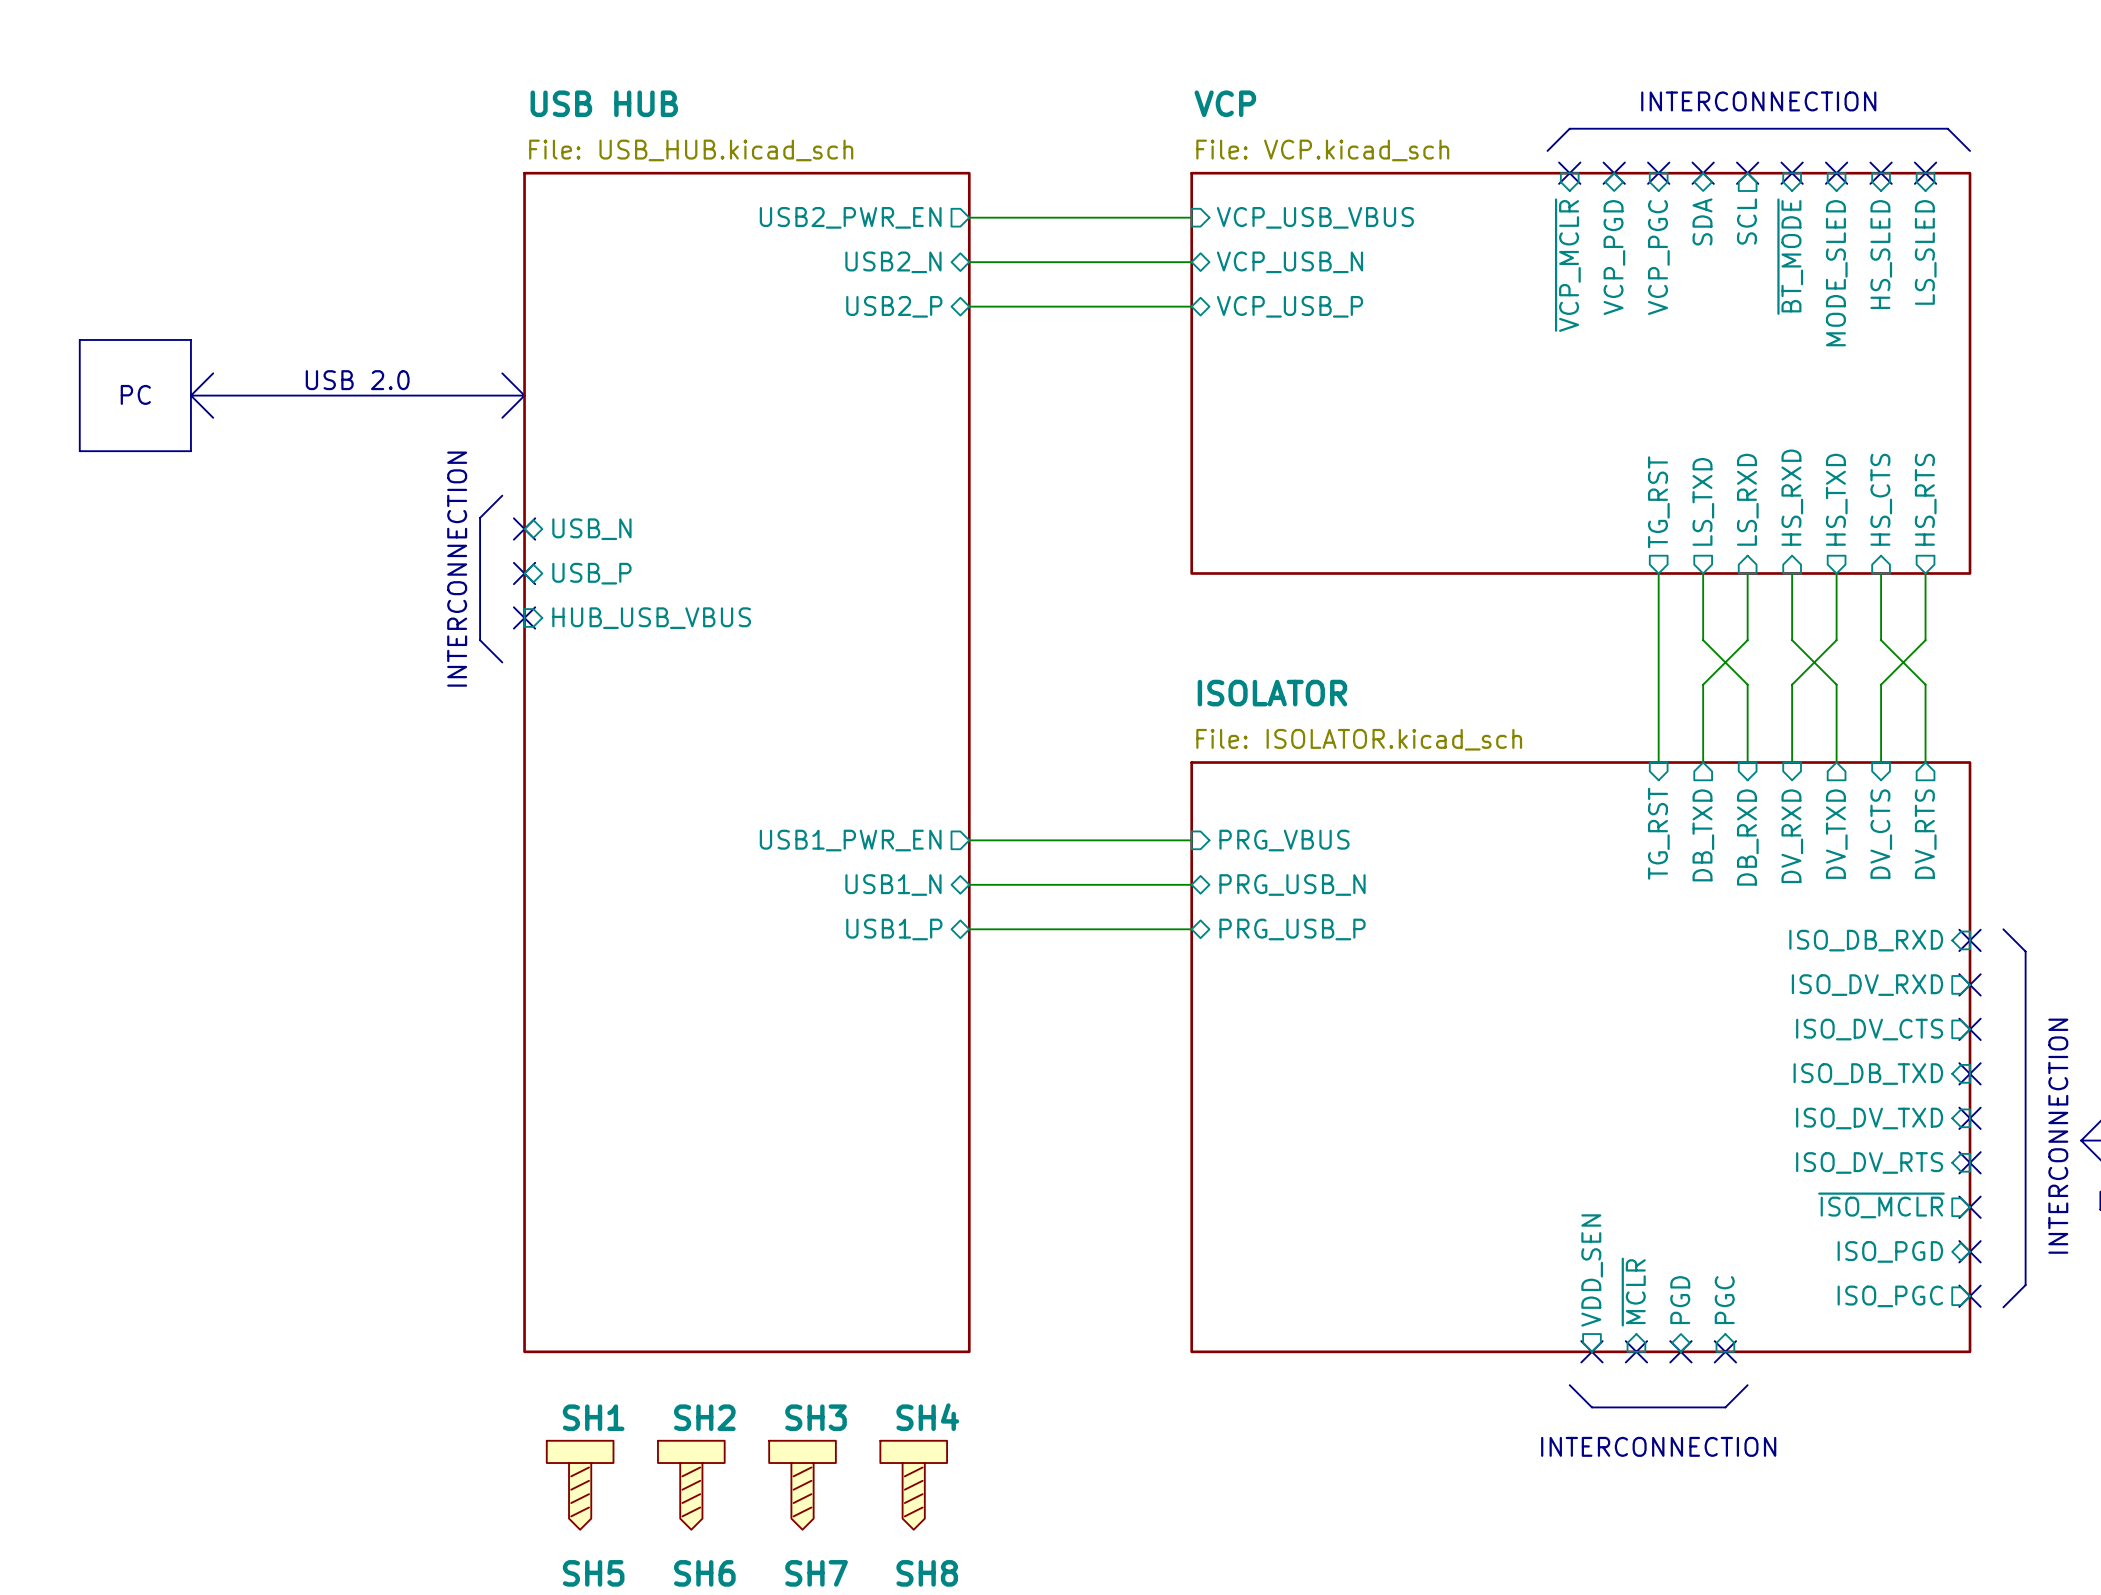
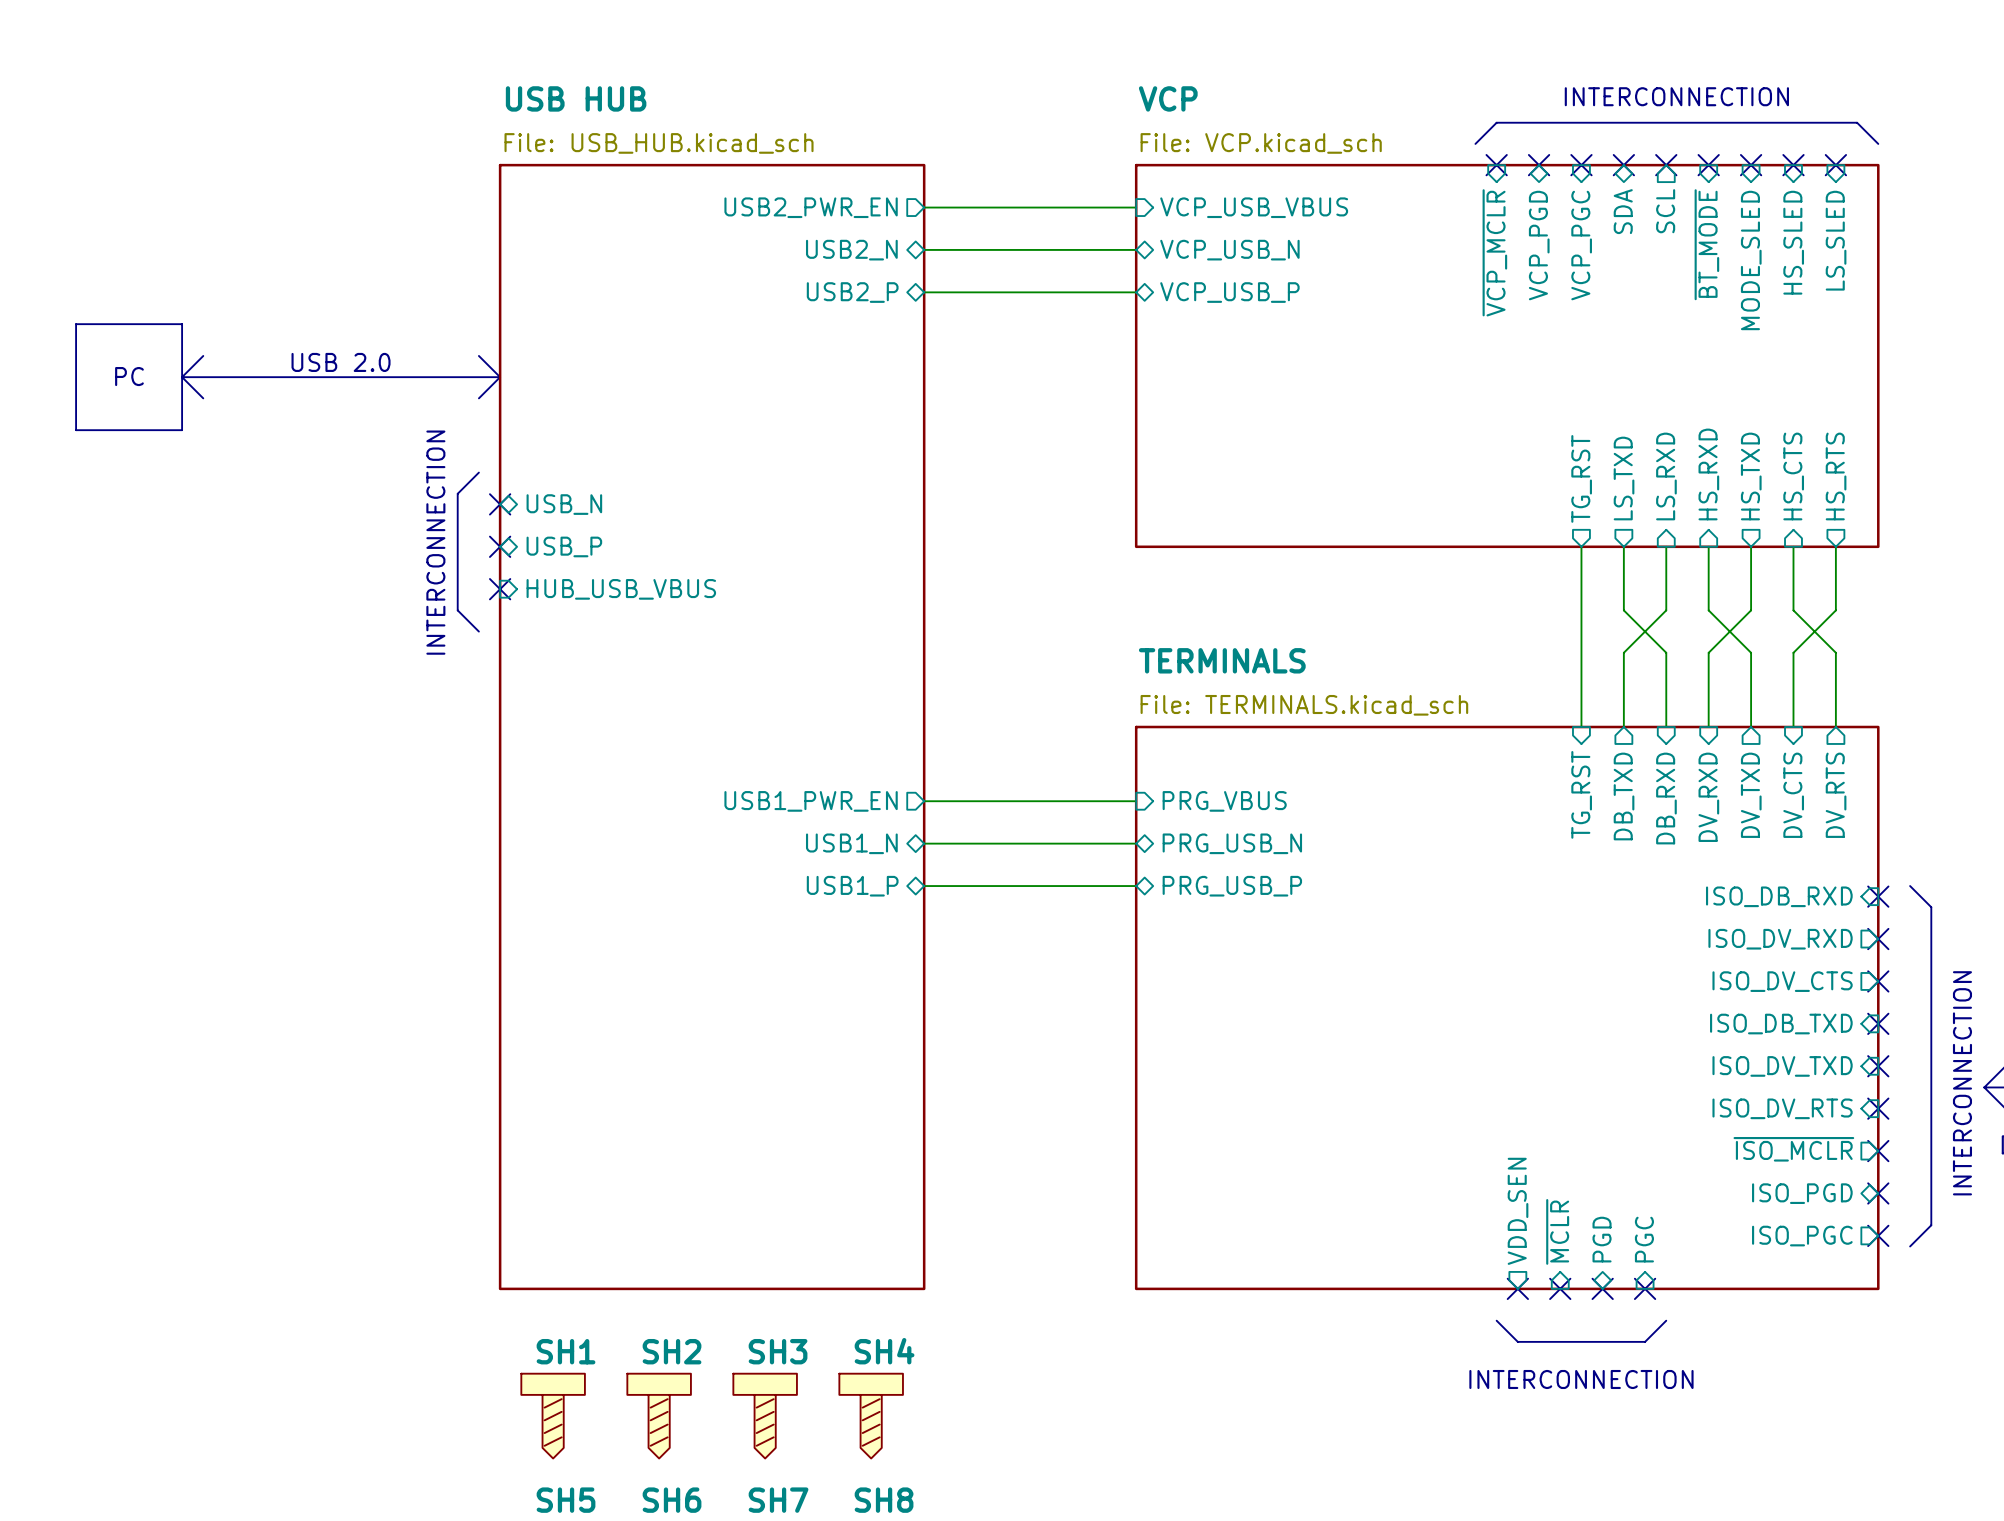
sheet ISOLATOR name: ISOLATOR (1272, 693) -> TERMINALS (1222, 660)
sheet ISOLATOR value: File: ISOLATOR.kicad_sch (1359, 739) -> File: TERMINALS.kicad_sch (1304, 705)

